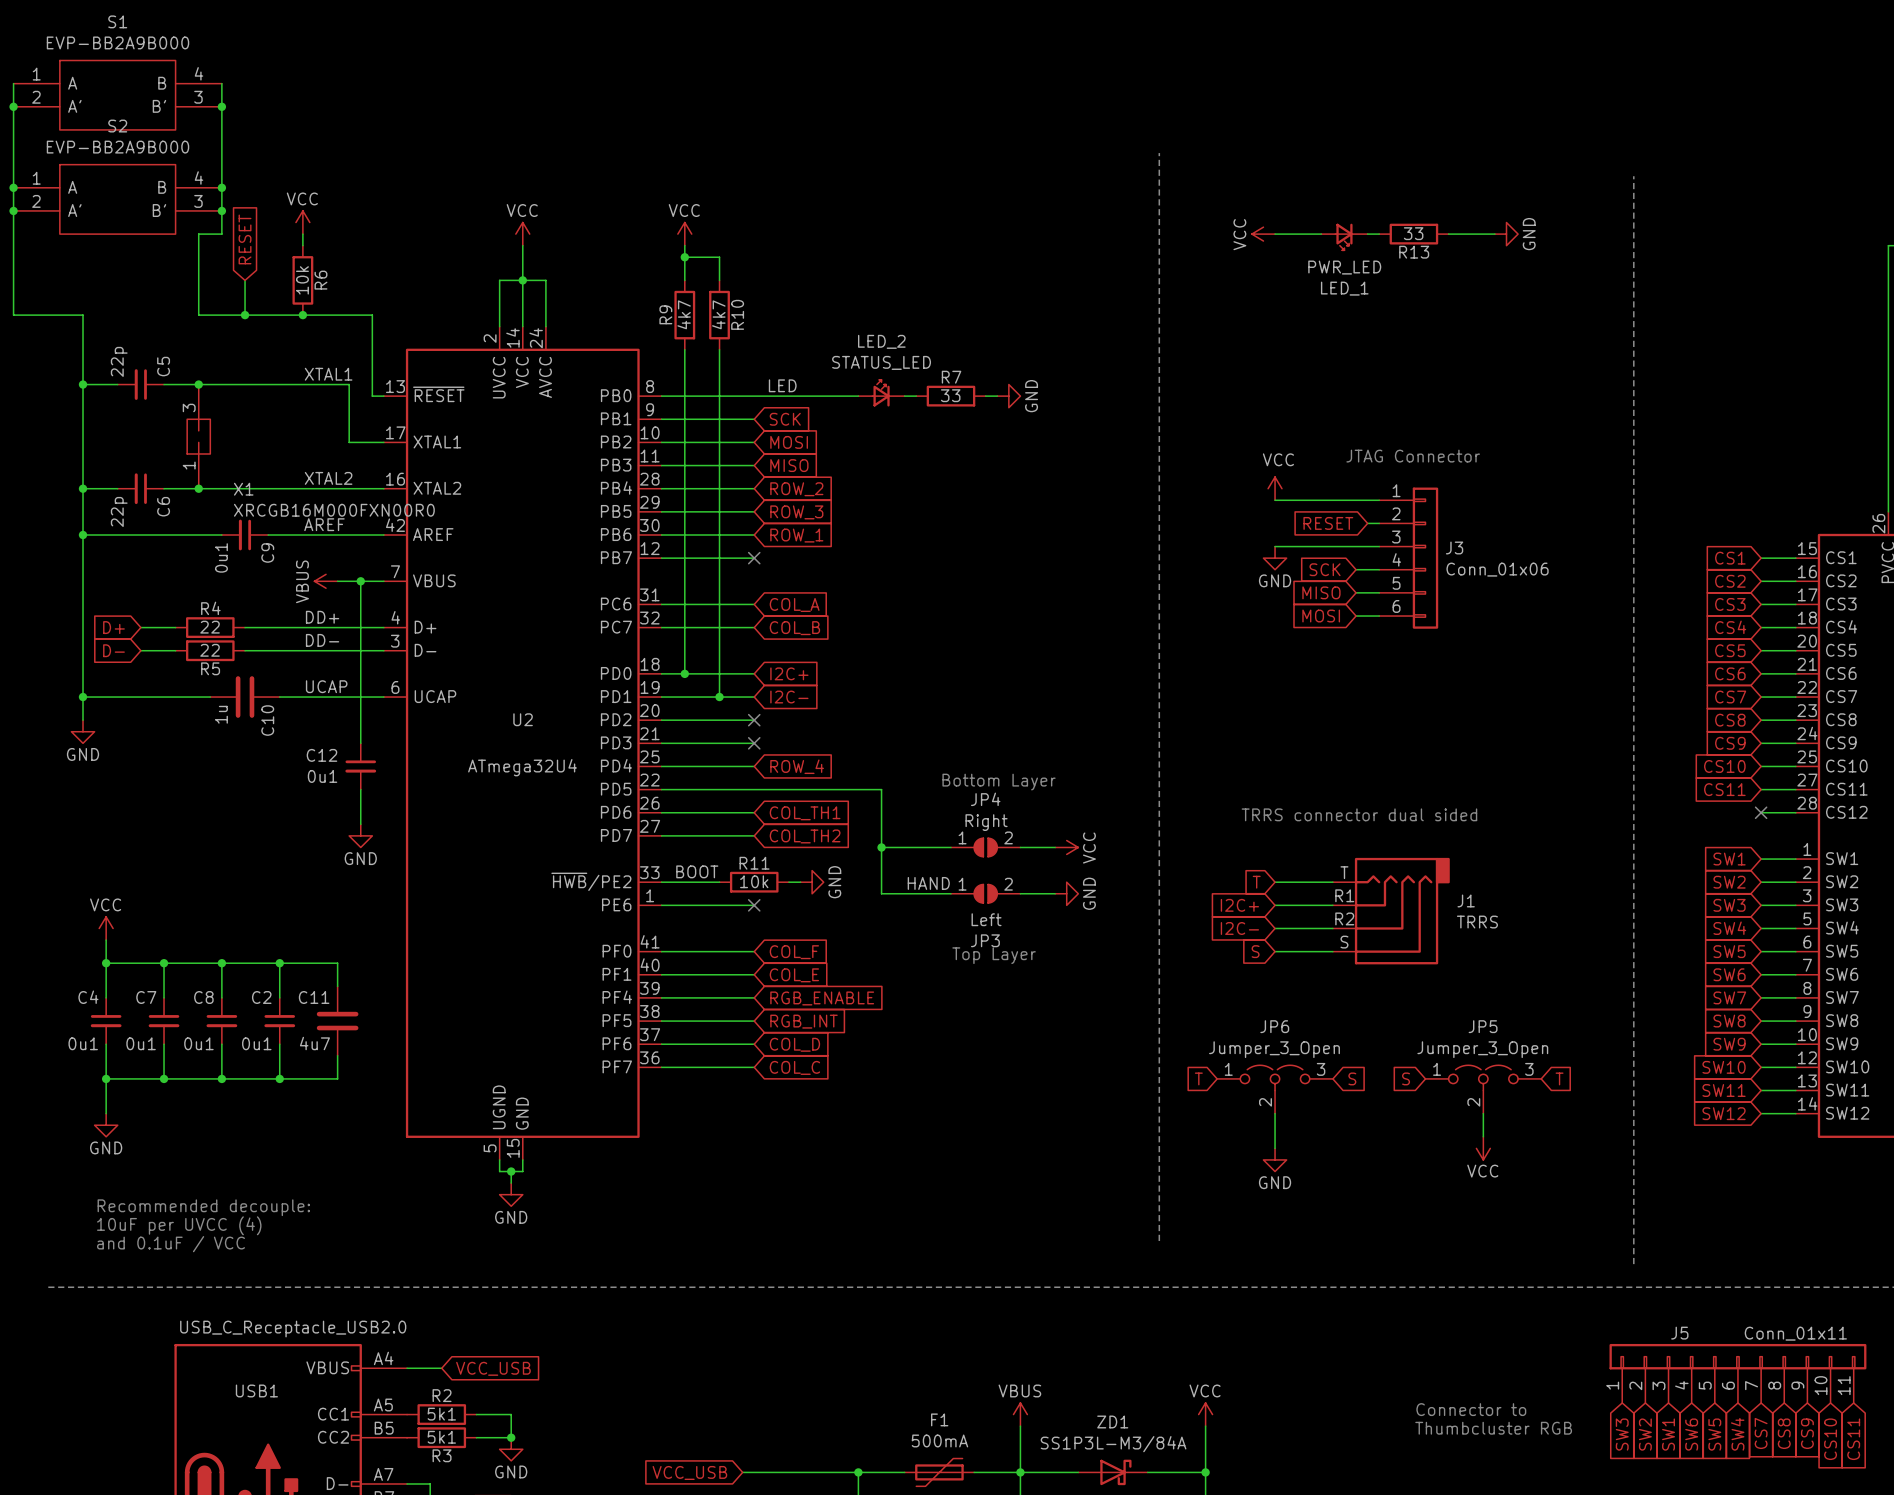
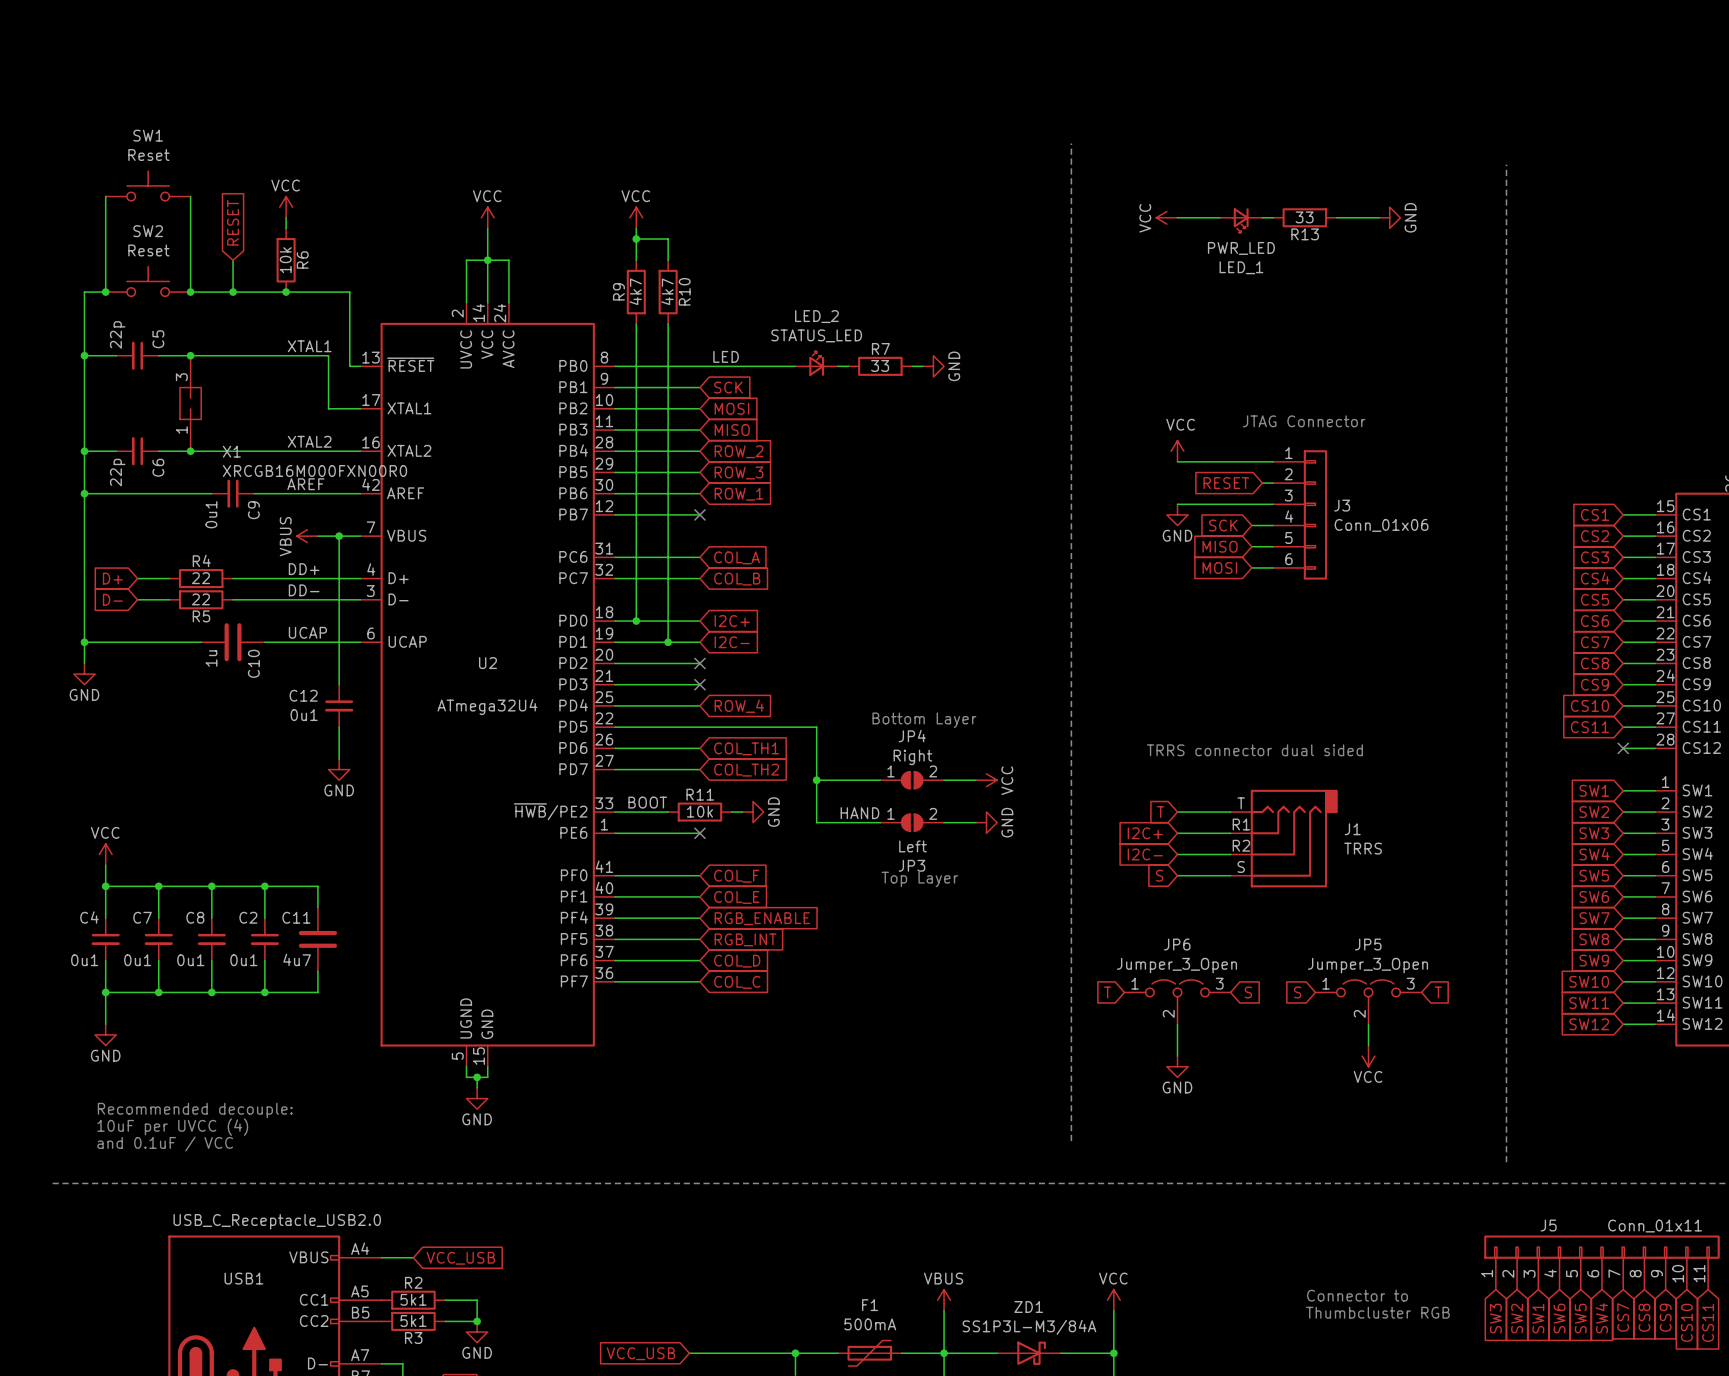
wire: (13, 83) (13, 315) (83, 315) -> (105, 196) (105, 292) (84, 292)
wire: (221, 83) (221, 234) (198, 234) -> (190, 196) (190, 217)
S1: EVP-BB2A9B000 (117, 95) -> none
junction: (13, 106) -> none
junction: (221, 106) -> none
junction: (13, 187) -> none
junction: (221, 187) -> none
S2: EVP-BB2A9B000 (117, 199) -> none
SW1: none -> Reset (148, 185)
junction: (13, 210) -> none
junction: (221, 210) -> none
SW2: none -> Reset (148, 281)
junction: none -> (105, 292)
junction: none -> (190, 292)

